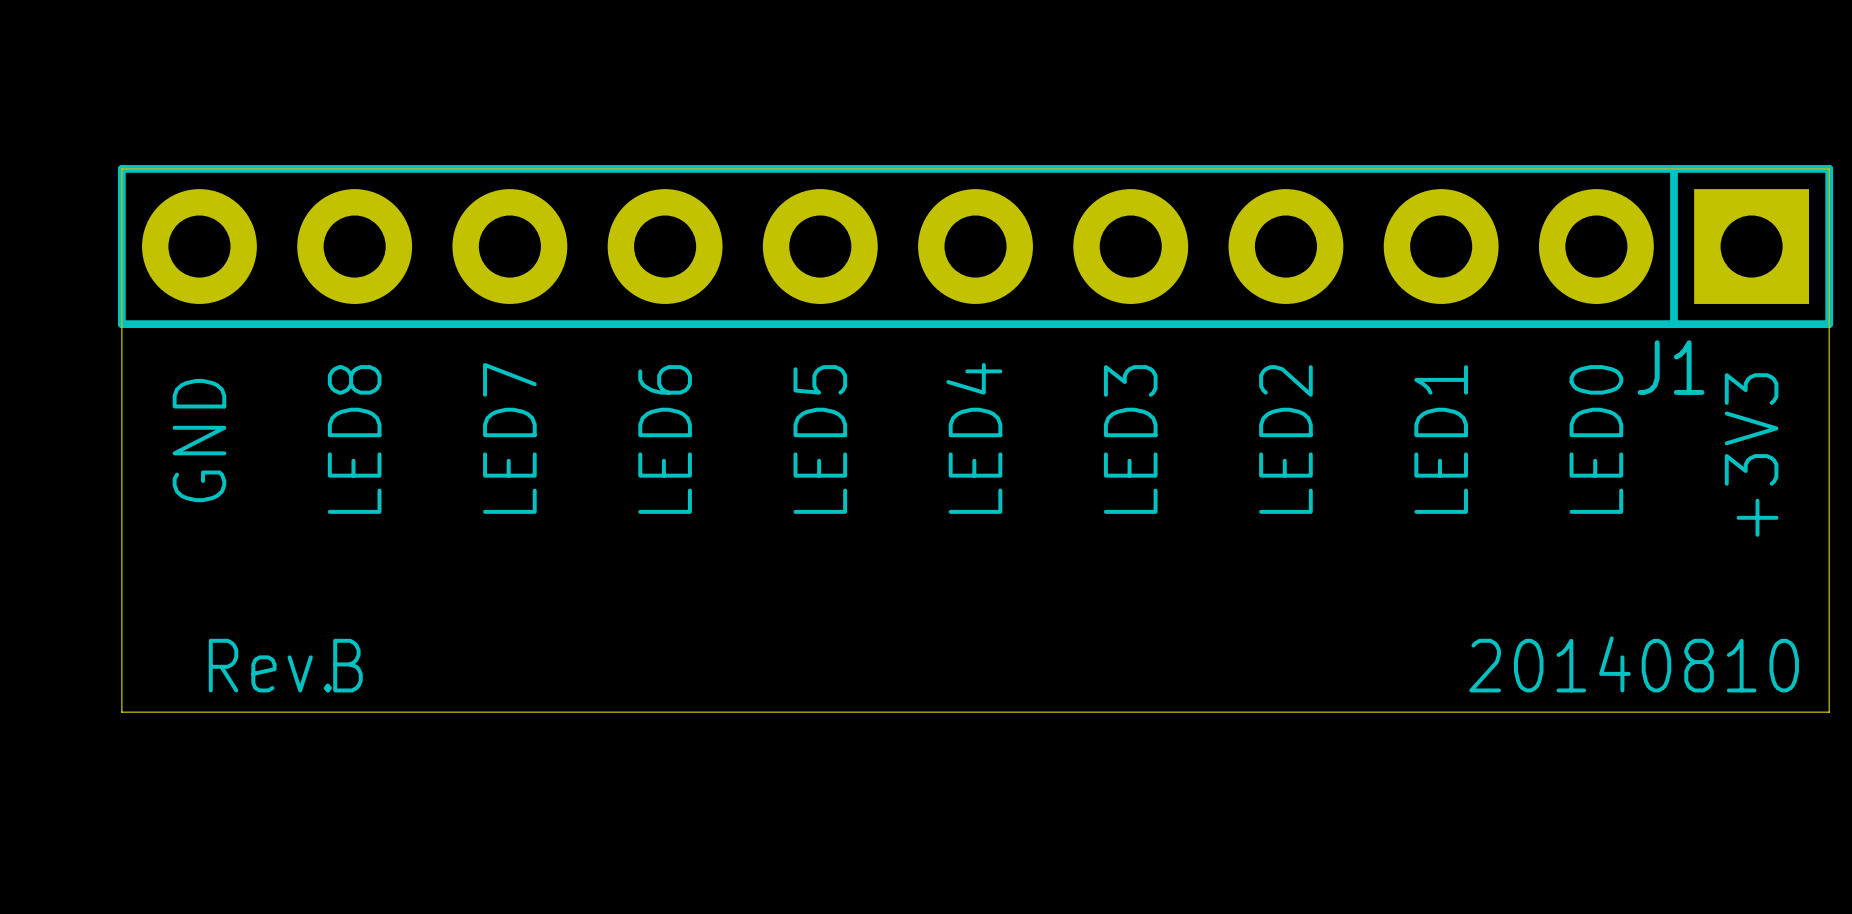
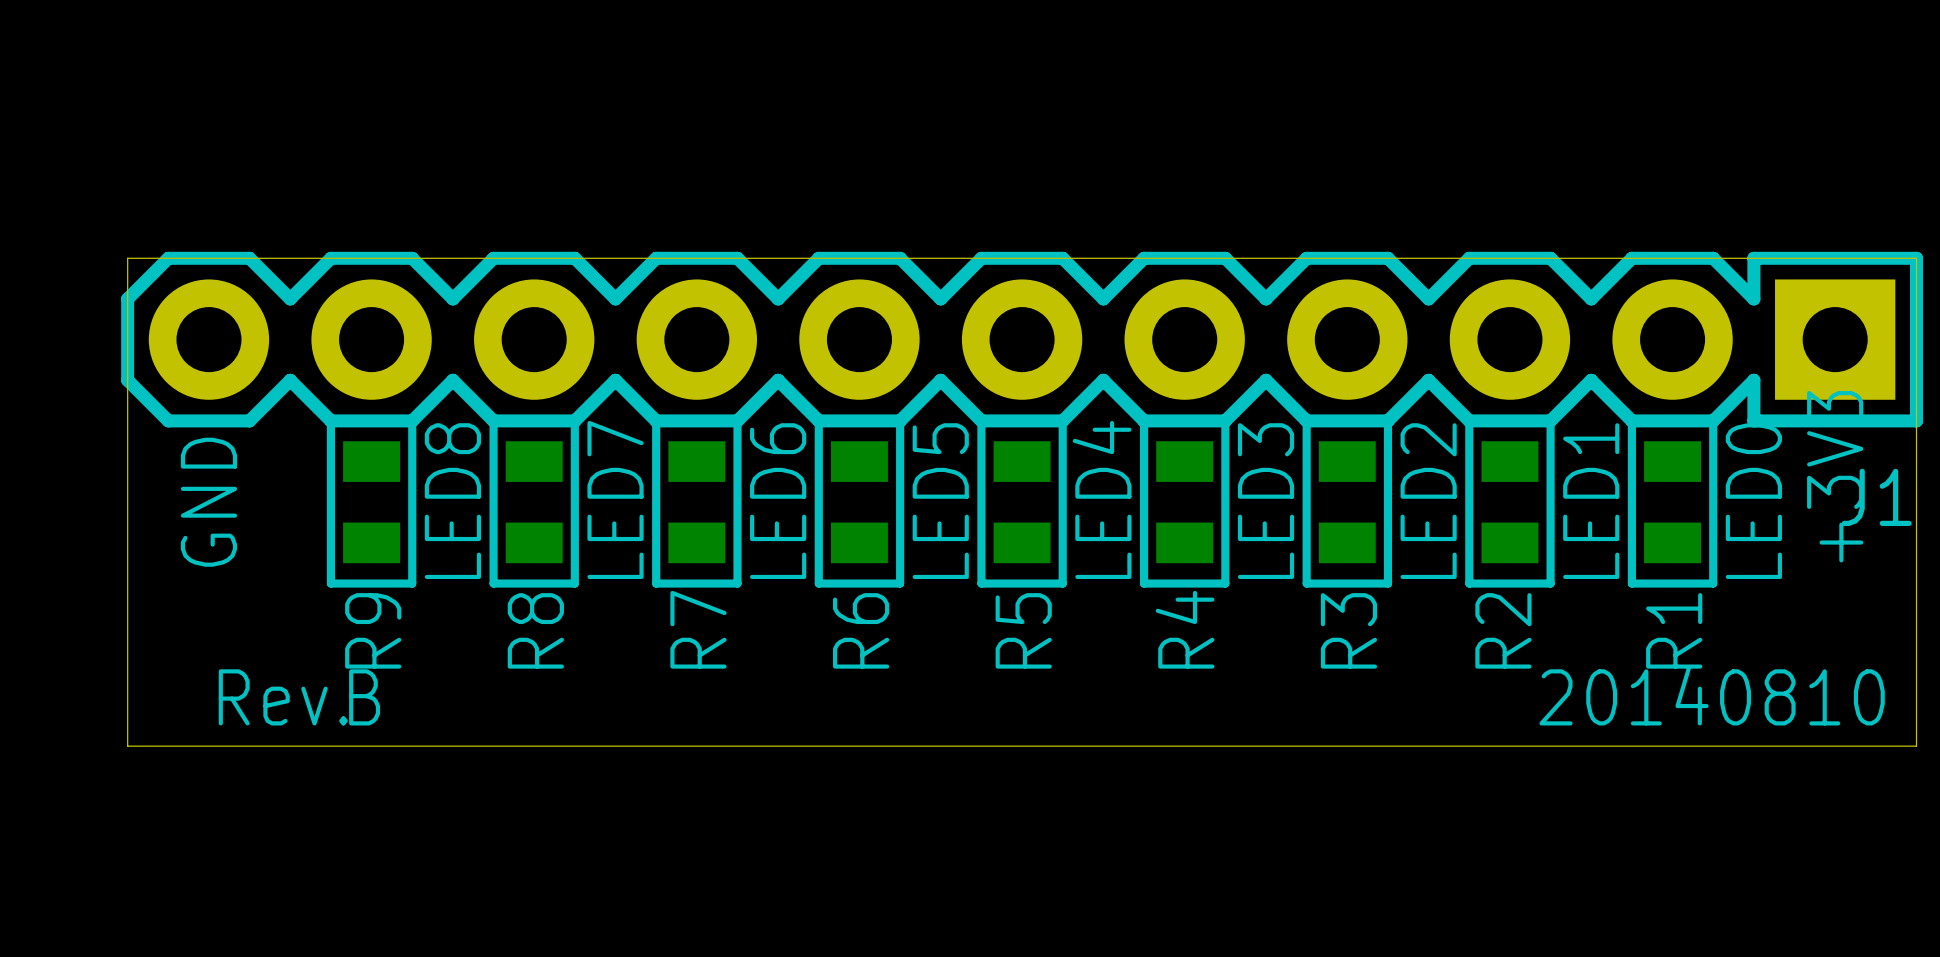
J1 footprint: [117, 165, 1834, 329] -> [121, 251, 1924, 428]
board edge: (1829, 246) (1829, 168) (121, 168) (121, 246) -> (1916, 258) (127, 258)
text position: LED7 (509, 438) -> LED7 (615, 500)
text position: LED4 (974, 438) -> LED4 (1102, 500)
text position: LED8 (354, 439) -> LED8 (452, 501)
text position: LED6 (665, 439) -> LED6 (778, 501)
text position: LED5 (820, 439) -> LED5 (940, 501)
text position: LED3 (1130, 439) -> LED3 (1266, 501)
text position: LED2 (1285, 439) -> LED2 (1428, 501)
text position: LED1 (1441, 439) -> LED1 (1591, 501)
text position: LED0 (1596, 439) -> LED0 (1753, 501)
text position: GND (199, 440) -> GND (208, 502)
R9: none -> (371, 502)
R8: none -> (534, 502)
R7: none -> (696, 502)
R6: none -> (859, 502)
R5: none -> (1022, 502)
R4: none -> (1184, 502)
R3: none -> (1347, 502)
R2: none -> (1509, 502)
R1: none -> (1672, 502)

